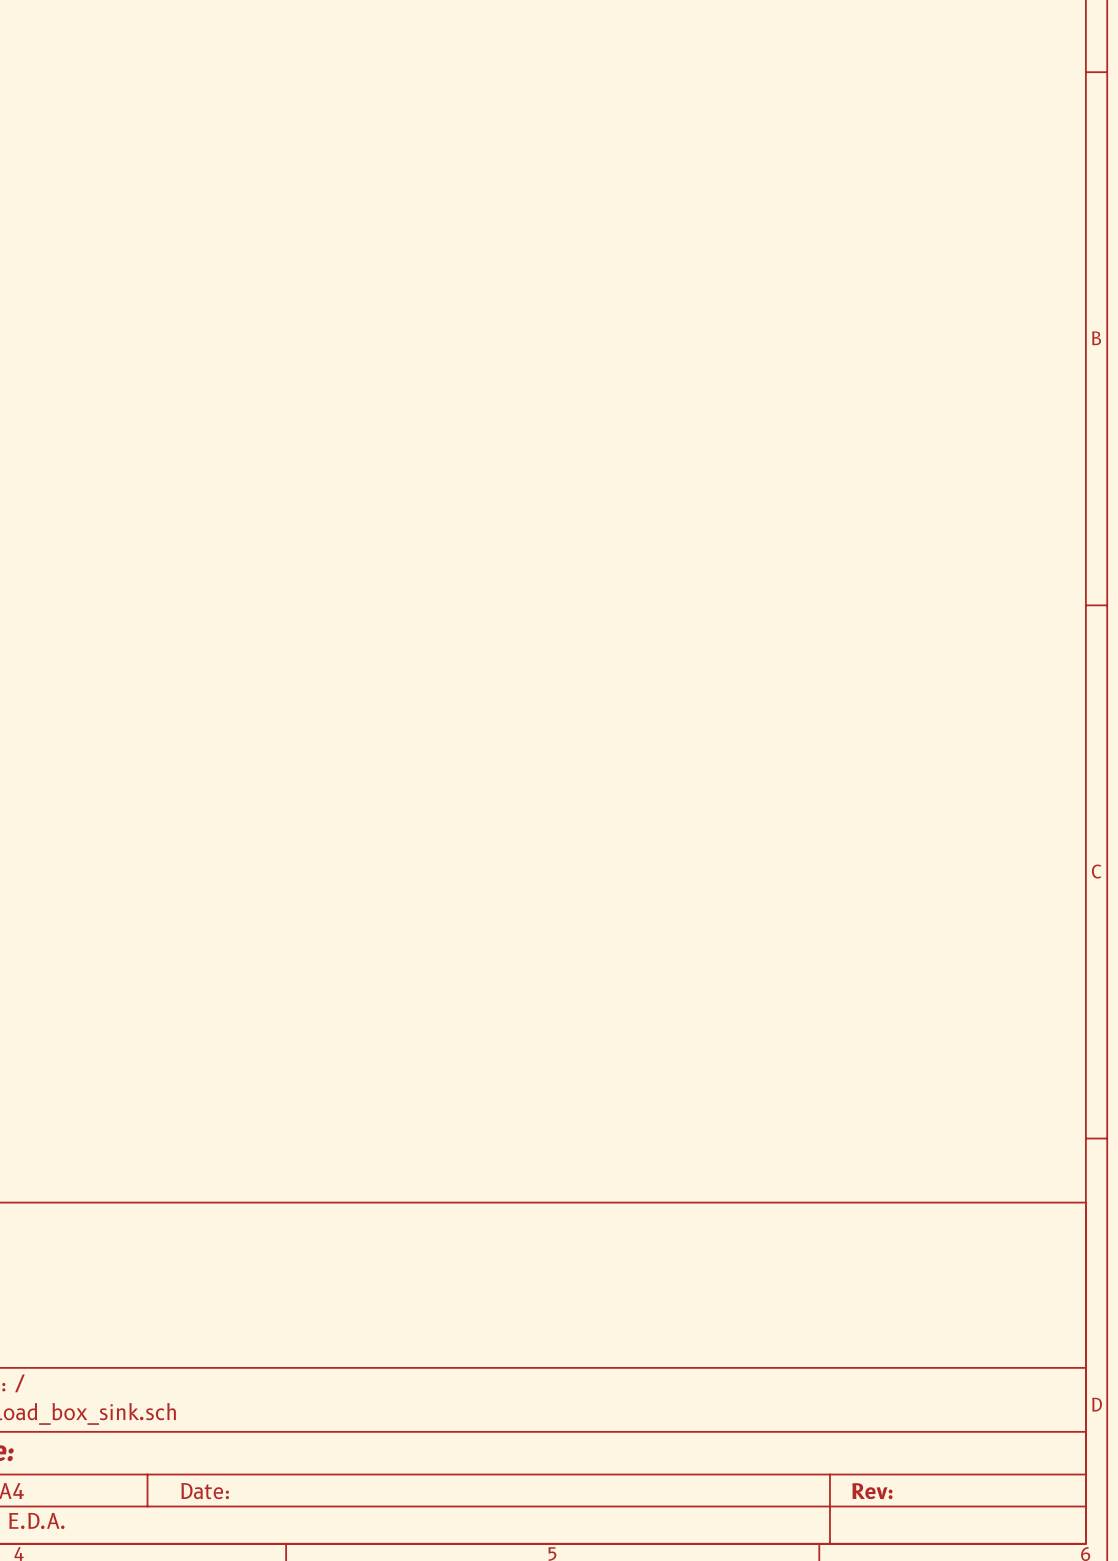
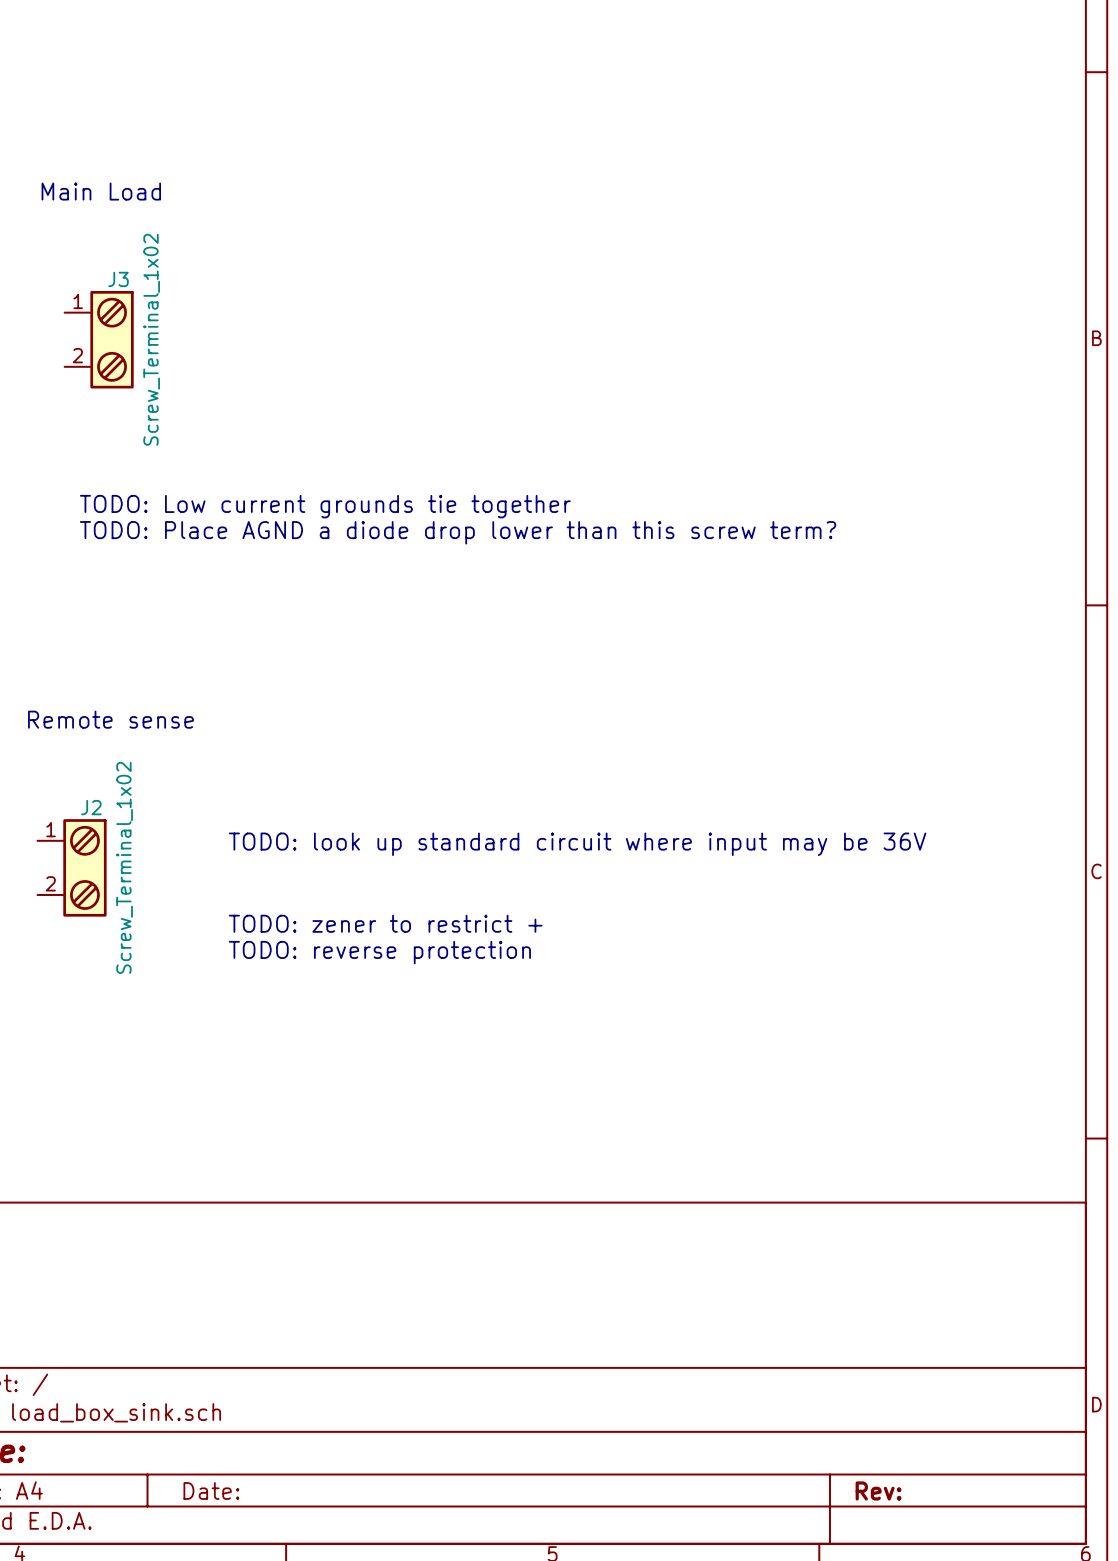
text: none -> Main Load (101, 191)
J3: none -> Screw_Terminal_1x02 (99, 339)
text: none -> TODO: Low current grounds tie together (325, 506)
text: none -> TODO: Place AGND a diode drop lower than this screw term? (458, 532)
text: none -> Remote sense (110, 719)
text: none -> TODO: look up standard circuit where input may be 36V (577, 844)
J2: none -> Screw_Terminal_1x02 (72, 867)
text: none -> TODO: zener to restrict + (385, 923)
text: none -> TODO: reverse protection (379, 952)

